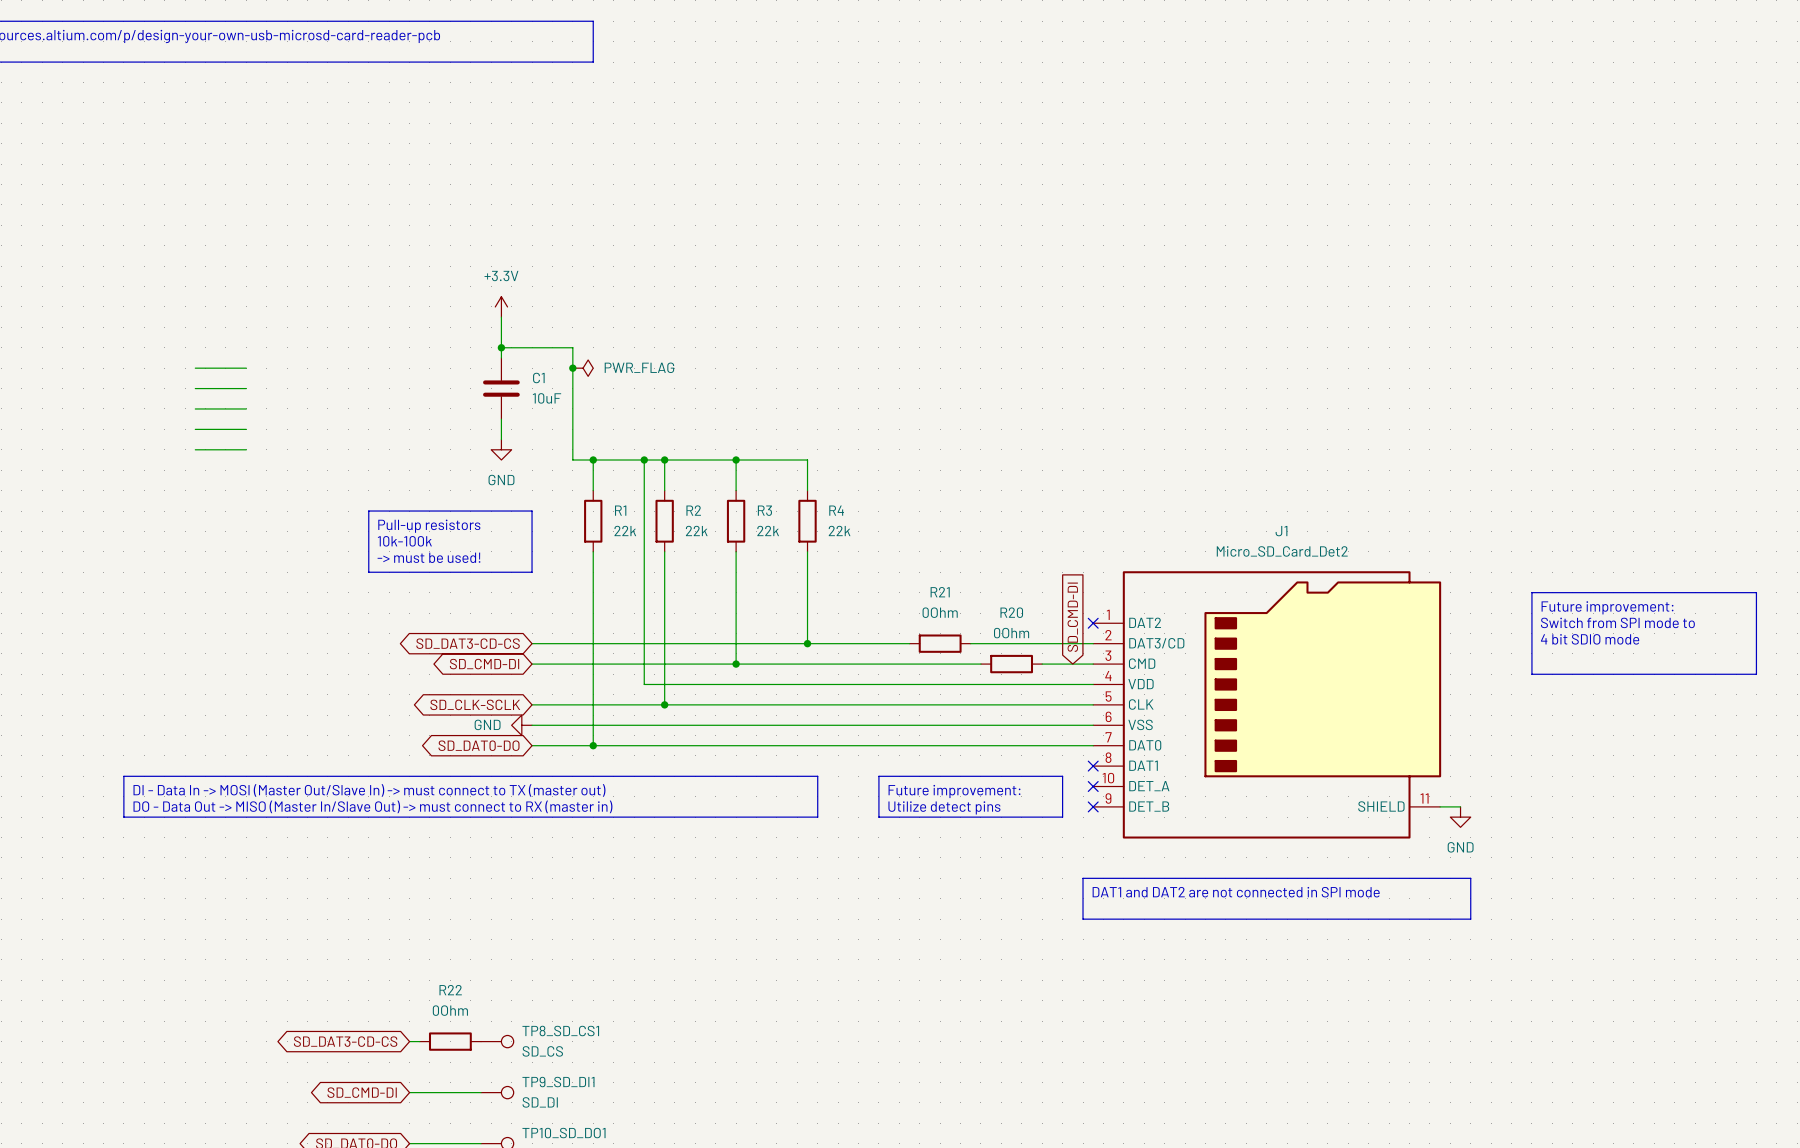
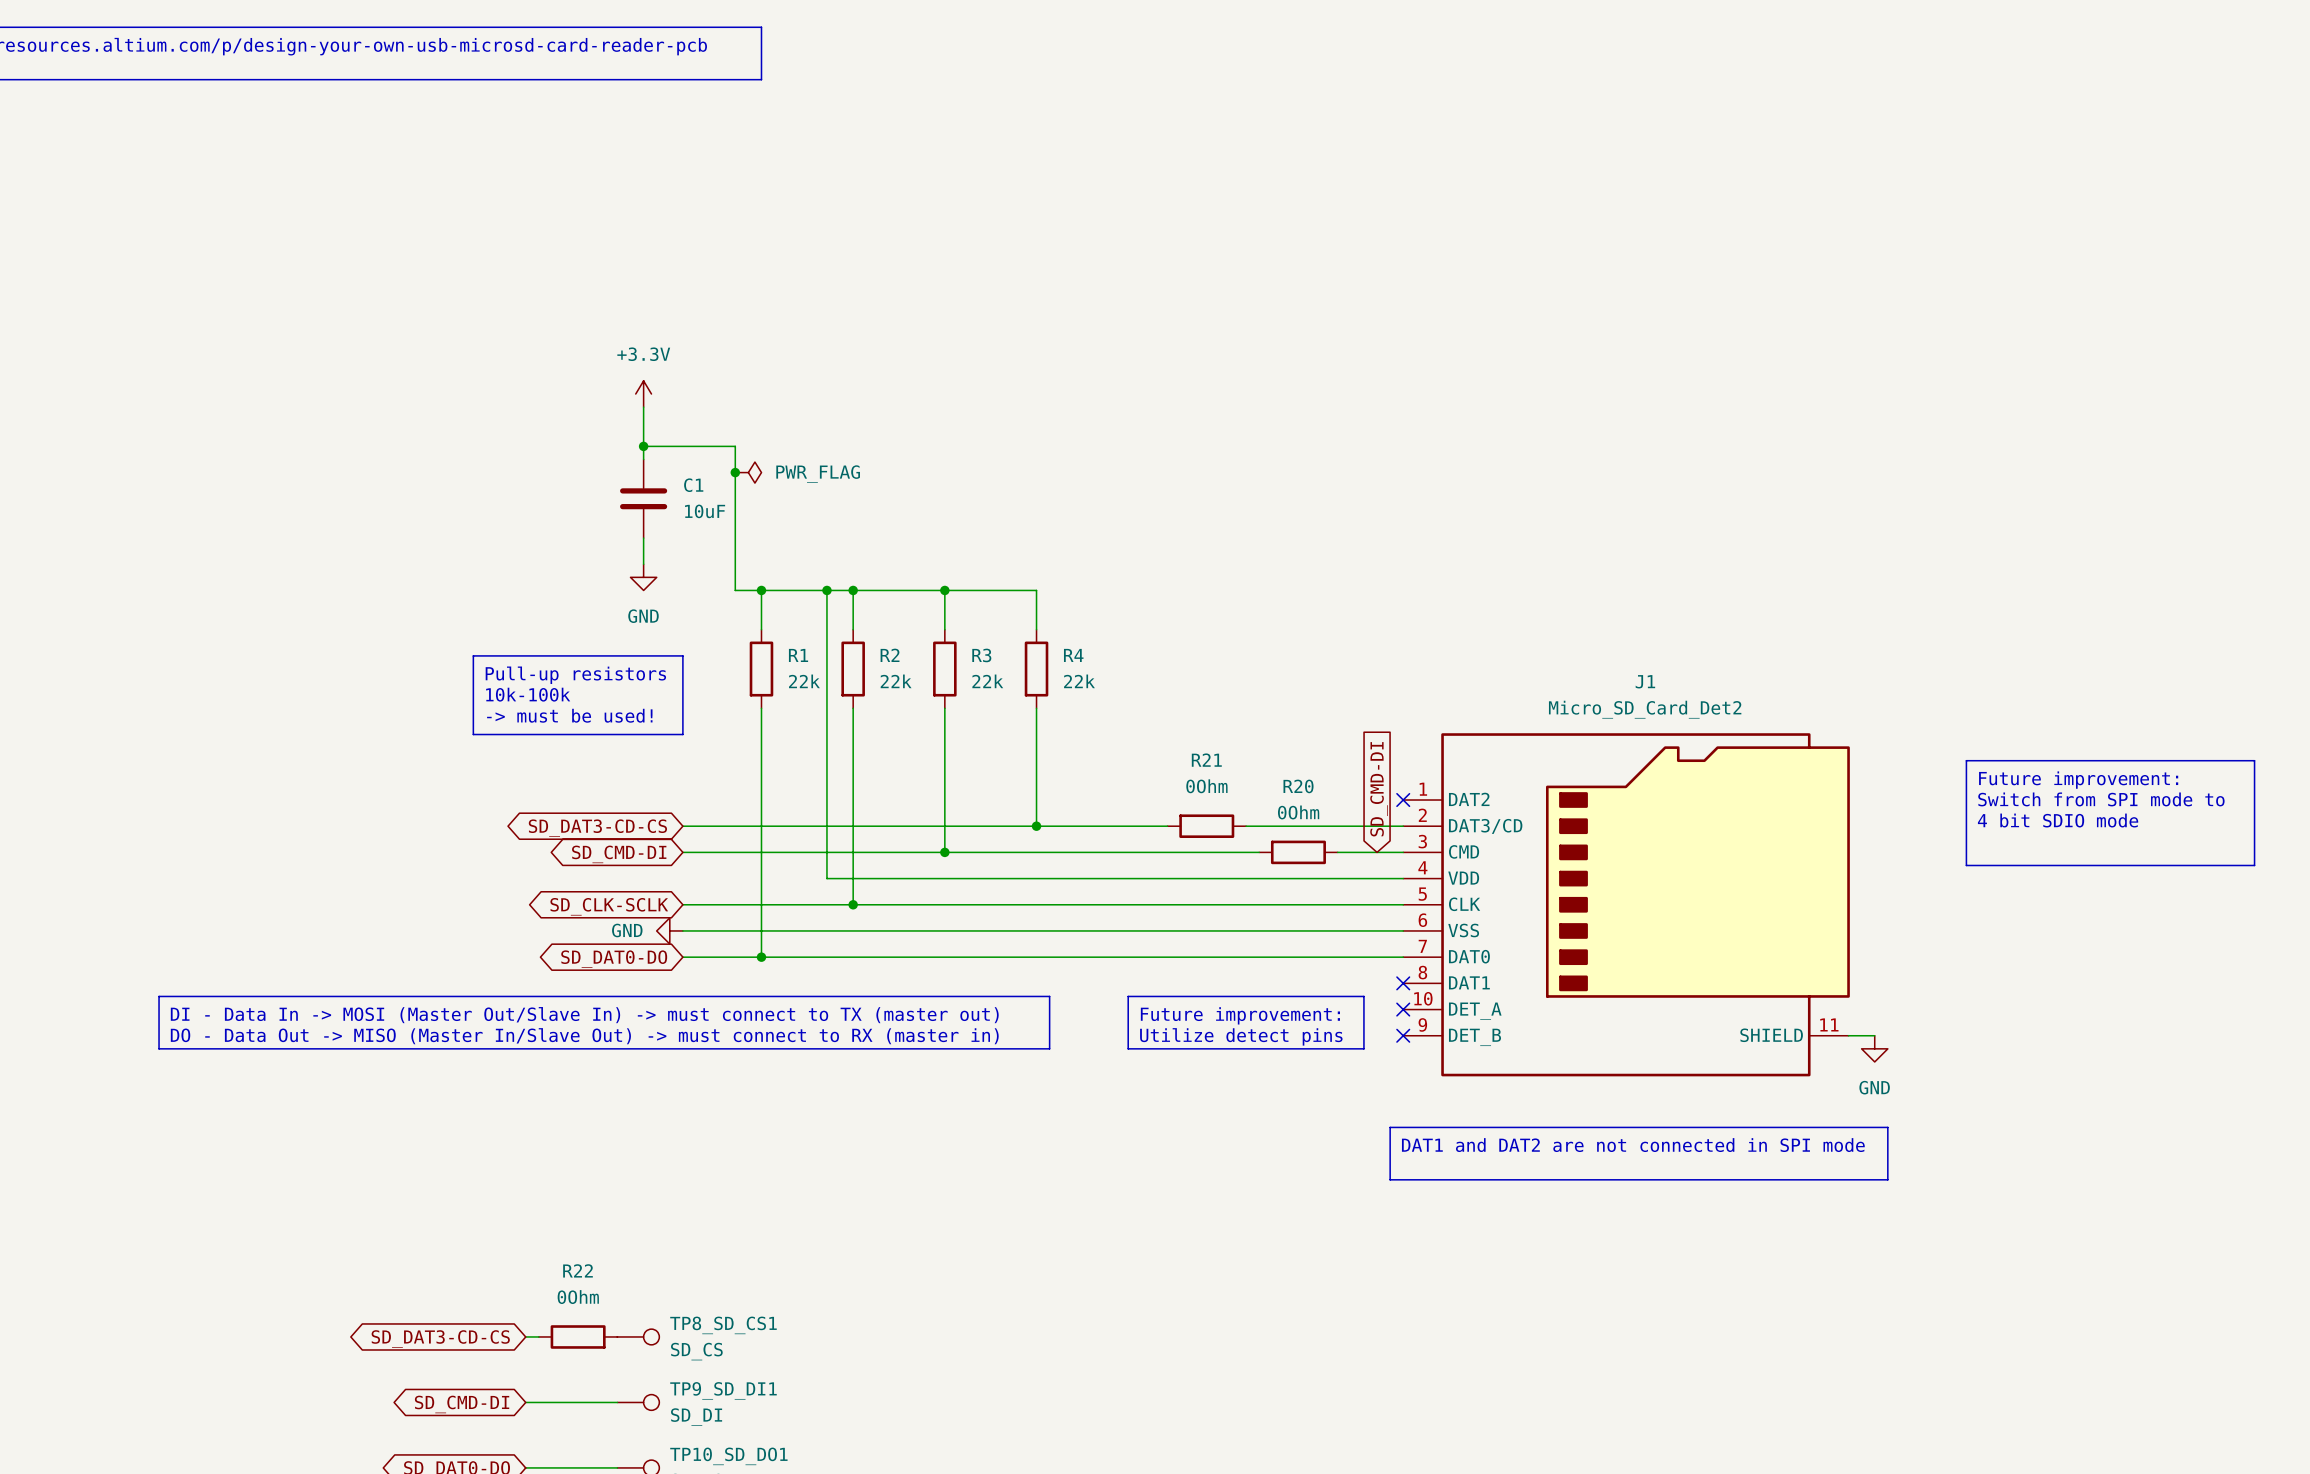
wire: (195, 368) (246, 368) -> none
wire: (195, 388) (246, 388) -> none
wire: (195, 408) (246, 408) -> none
wire: (195, 429) (246, 429) -> none
wire: (195, 449) (246, 449) -> none

